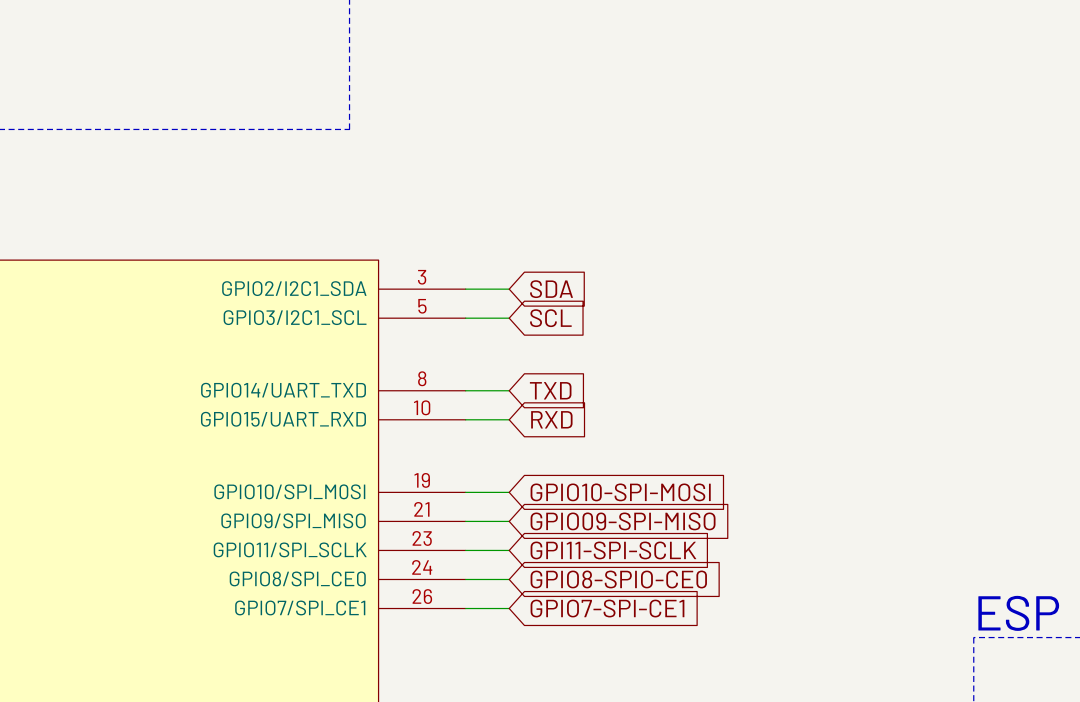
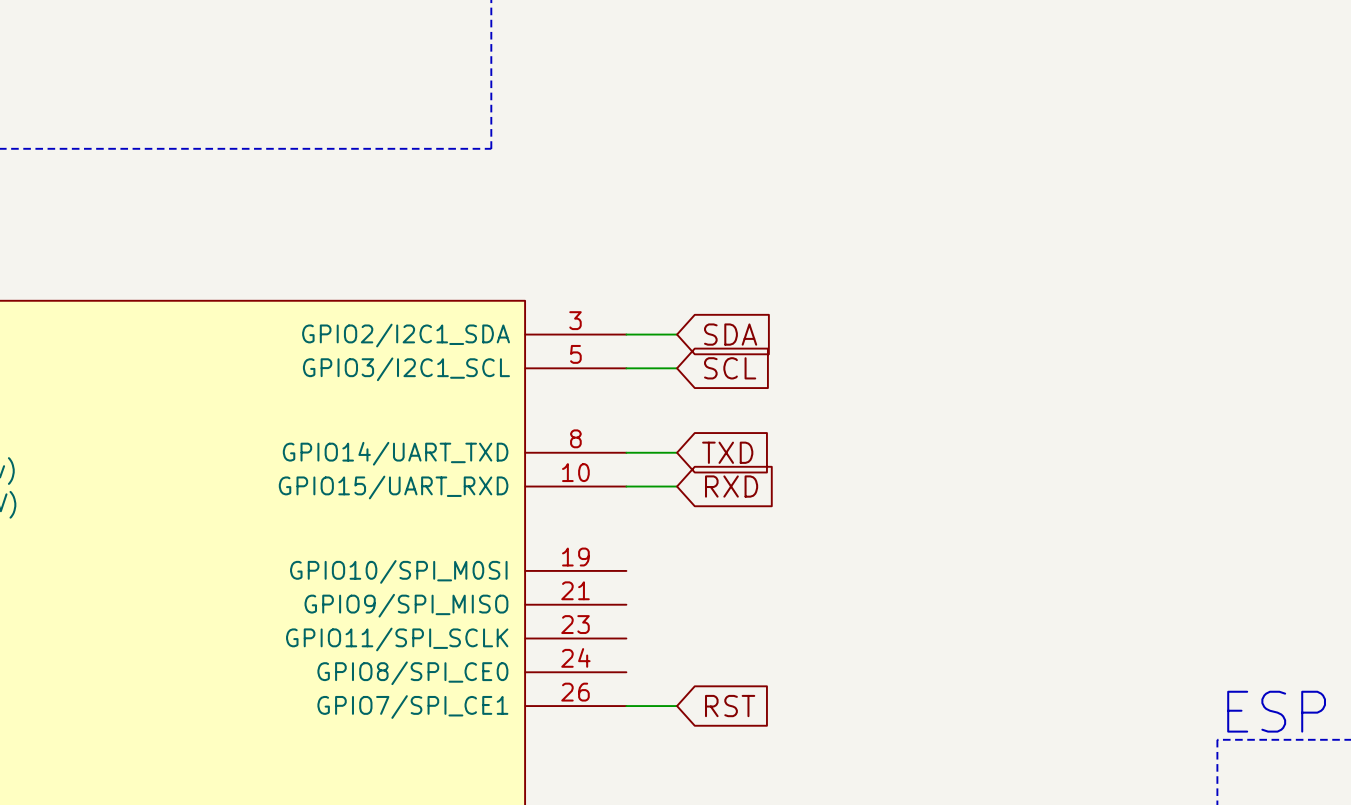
wire: (465, 492) (509, 492) -> none
global label: GPIO10-SPI-MOSI (620, 492) -> none
wire: (465, 521) (509, 521) -> none
global label: GPIO09-SPI-MISO (623, 521) -> none
wire: (465, 550) (509, 550) -> none
global label: GPI11-SPI-SCLK (613, 550) -> none
wire: (465, 579) (509, 579) -> none
global label: GPIO8-SPIO-CE0 (618, 579) -> none
global label: GPIO7-SPI-CE1 (607, 608) -> RST (730, 706)

